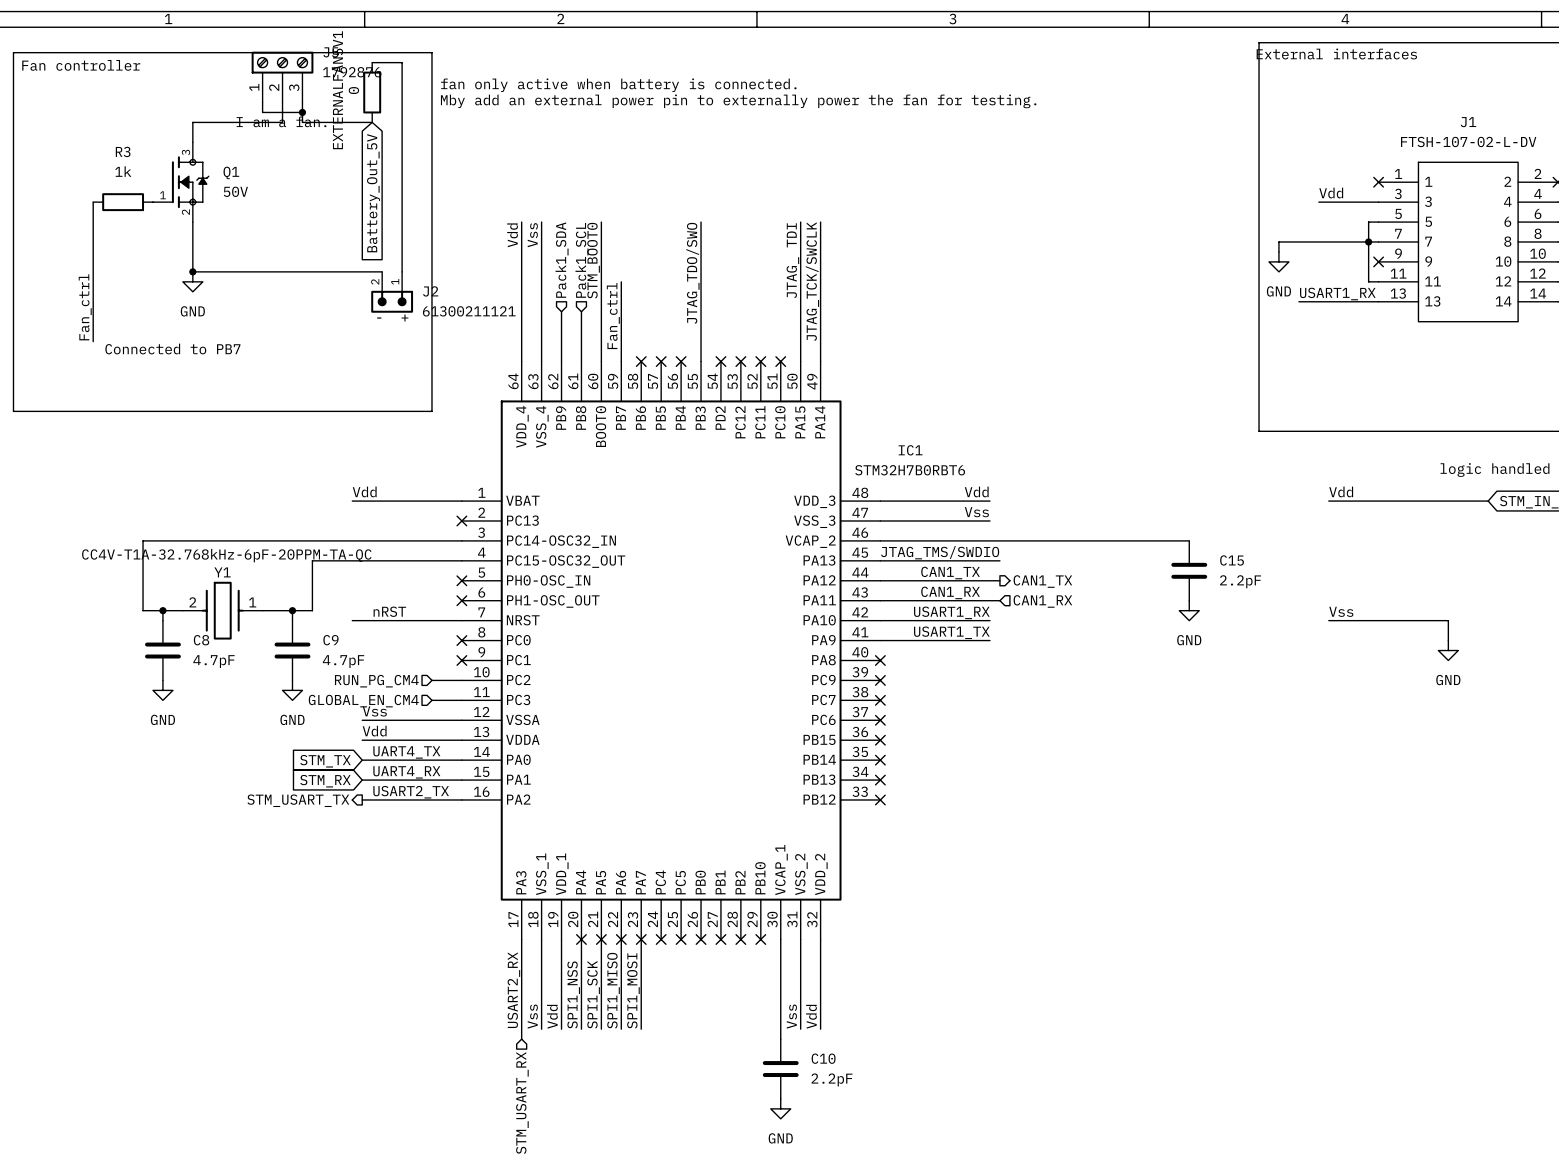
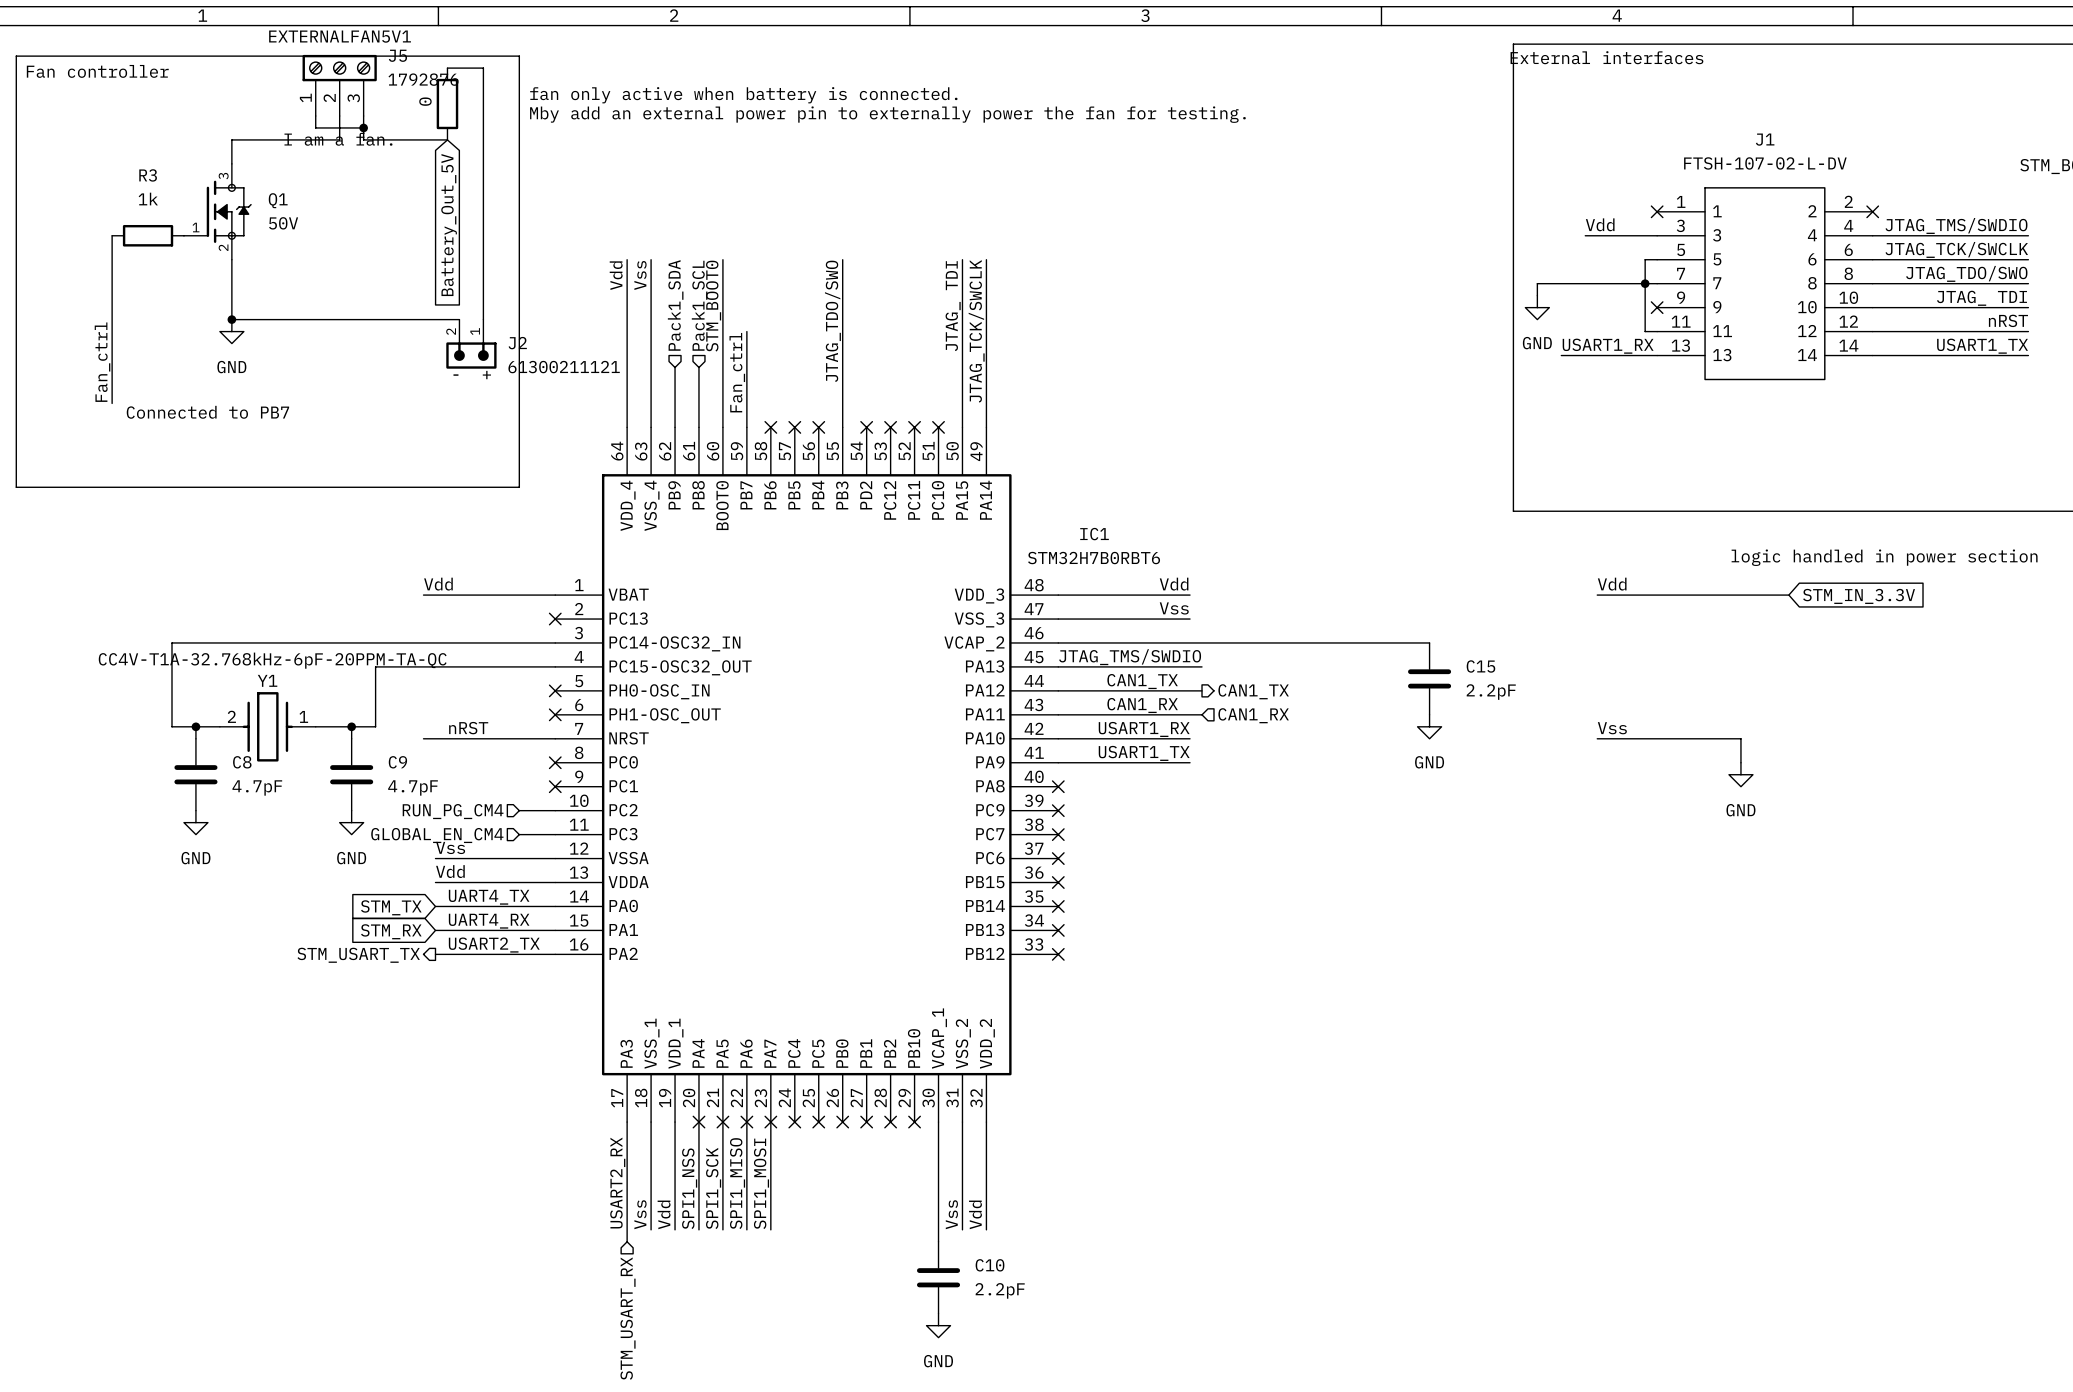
EXTERNALFAN5V1 name rotation: 0° (338, 90) -> 90° clockwise (340, 36)

